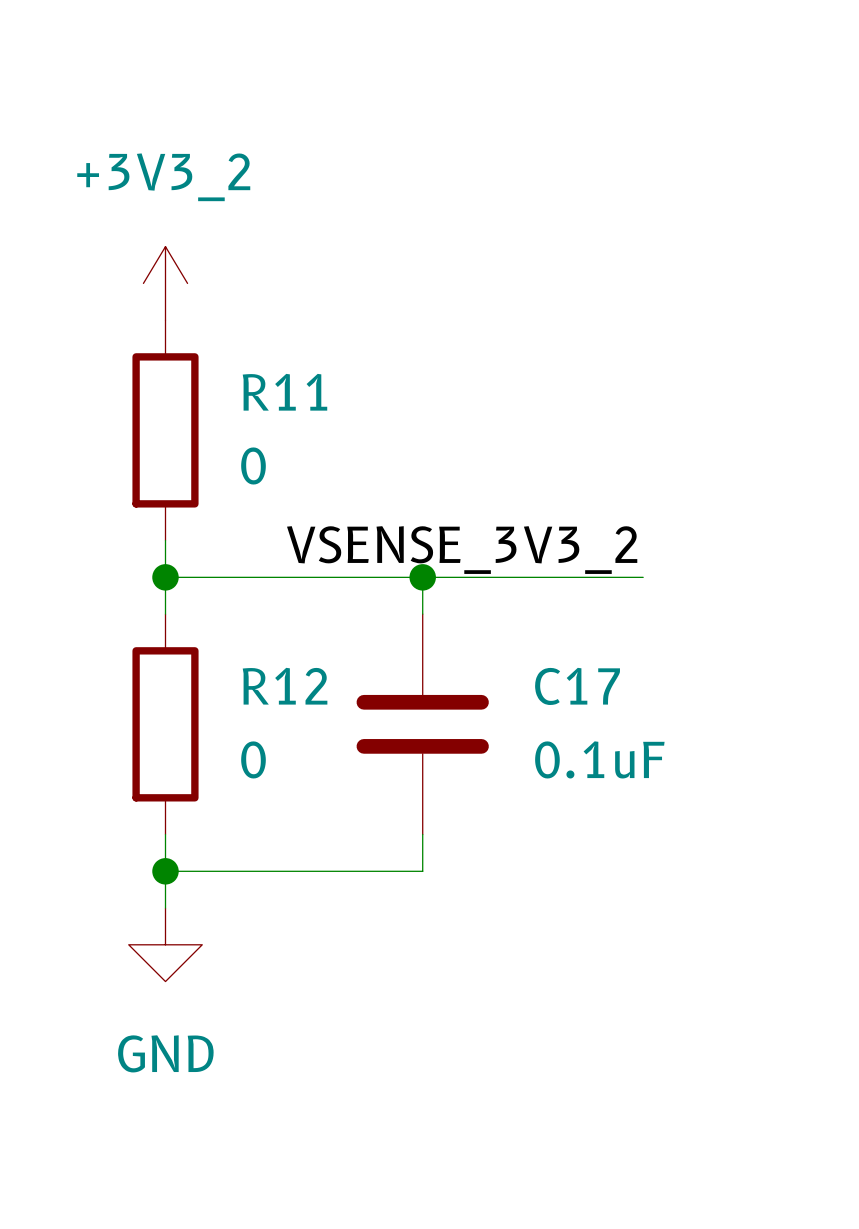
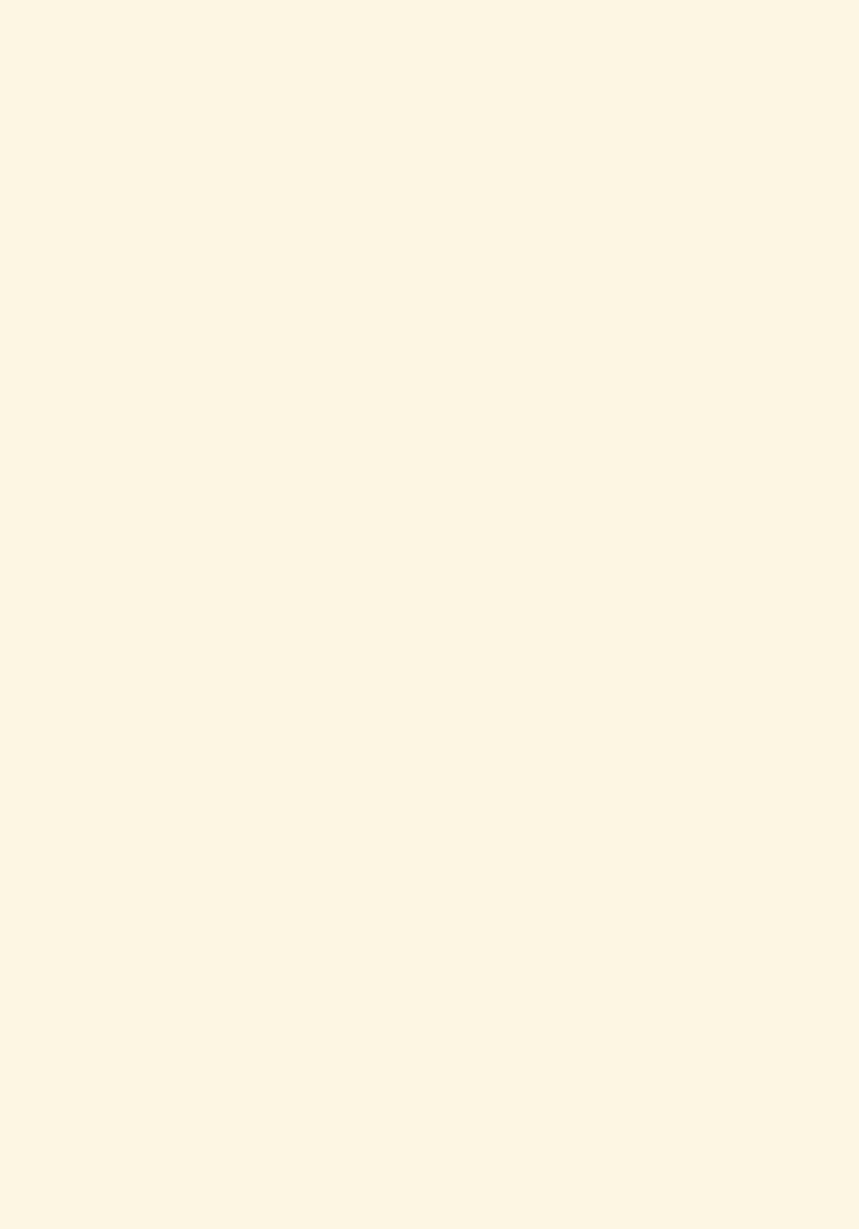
power symbol: +3V3_2 (165, 283) -> none
R11: 0 (165, 430) -> none
wire: (165, 540) (165, 614) -> none
label: VSENSE_3V3_2 (462, 550) -> none
wire: (165, 577) (643, 577) -> none
junction: (165, 577) -> none
wire: (422, 577) (422, 614) -> none
junction: (422, 577) -> none
R12: 0 (165, 724) -> none
C17: 0.1uF (422, 724) -> none
wire: (165, 834) (165, 908) -> none
wire: (422, 834) (422, 871) (165, 871) -> none
junction: (165, 871) -> none
power symbol: GND (165, 944) -> none

